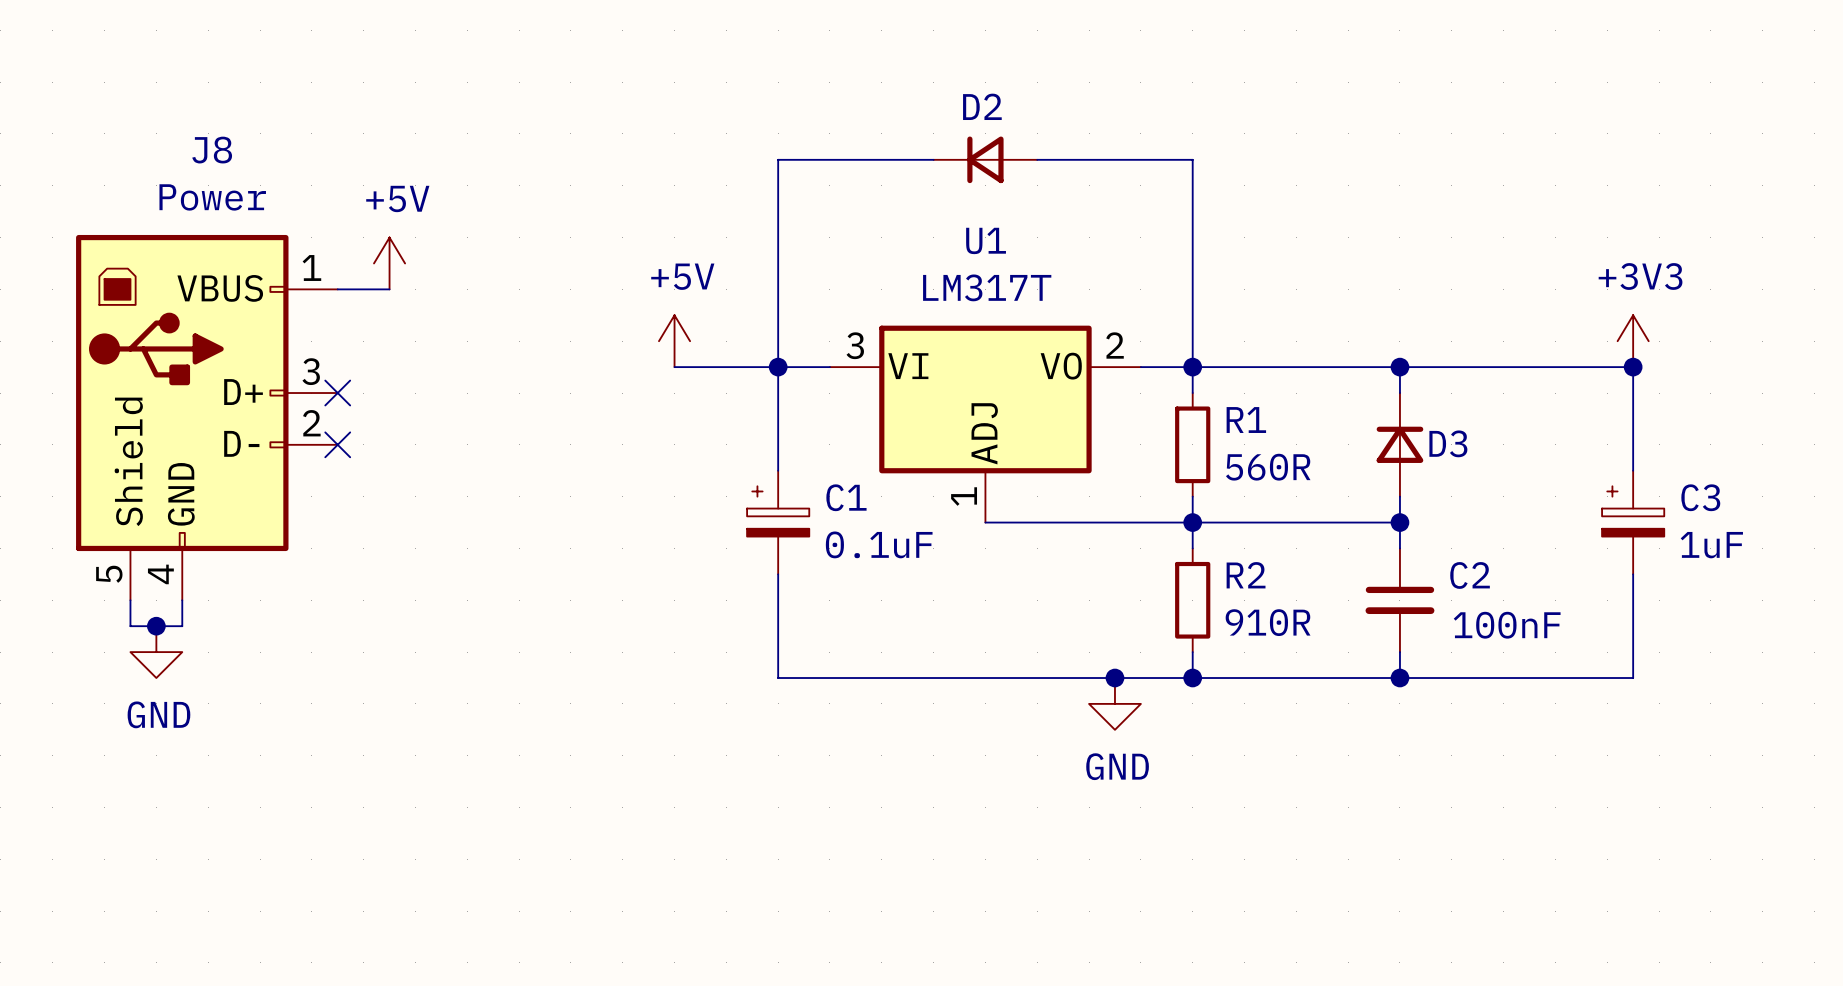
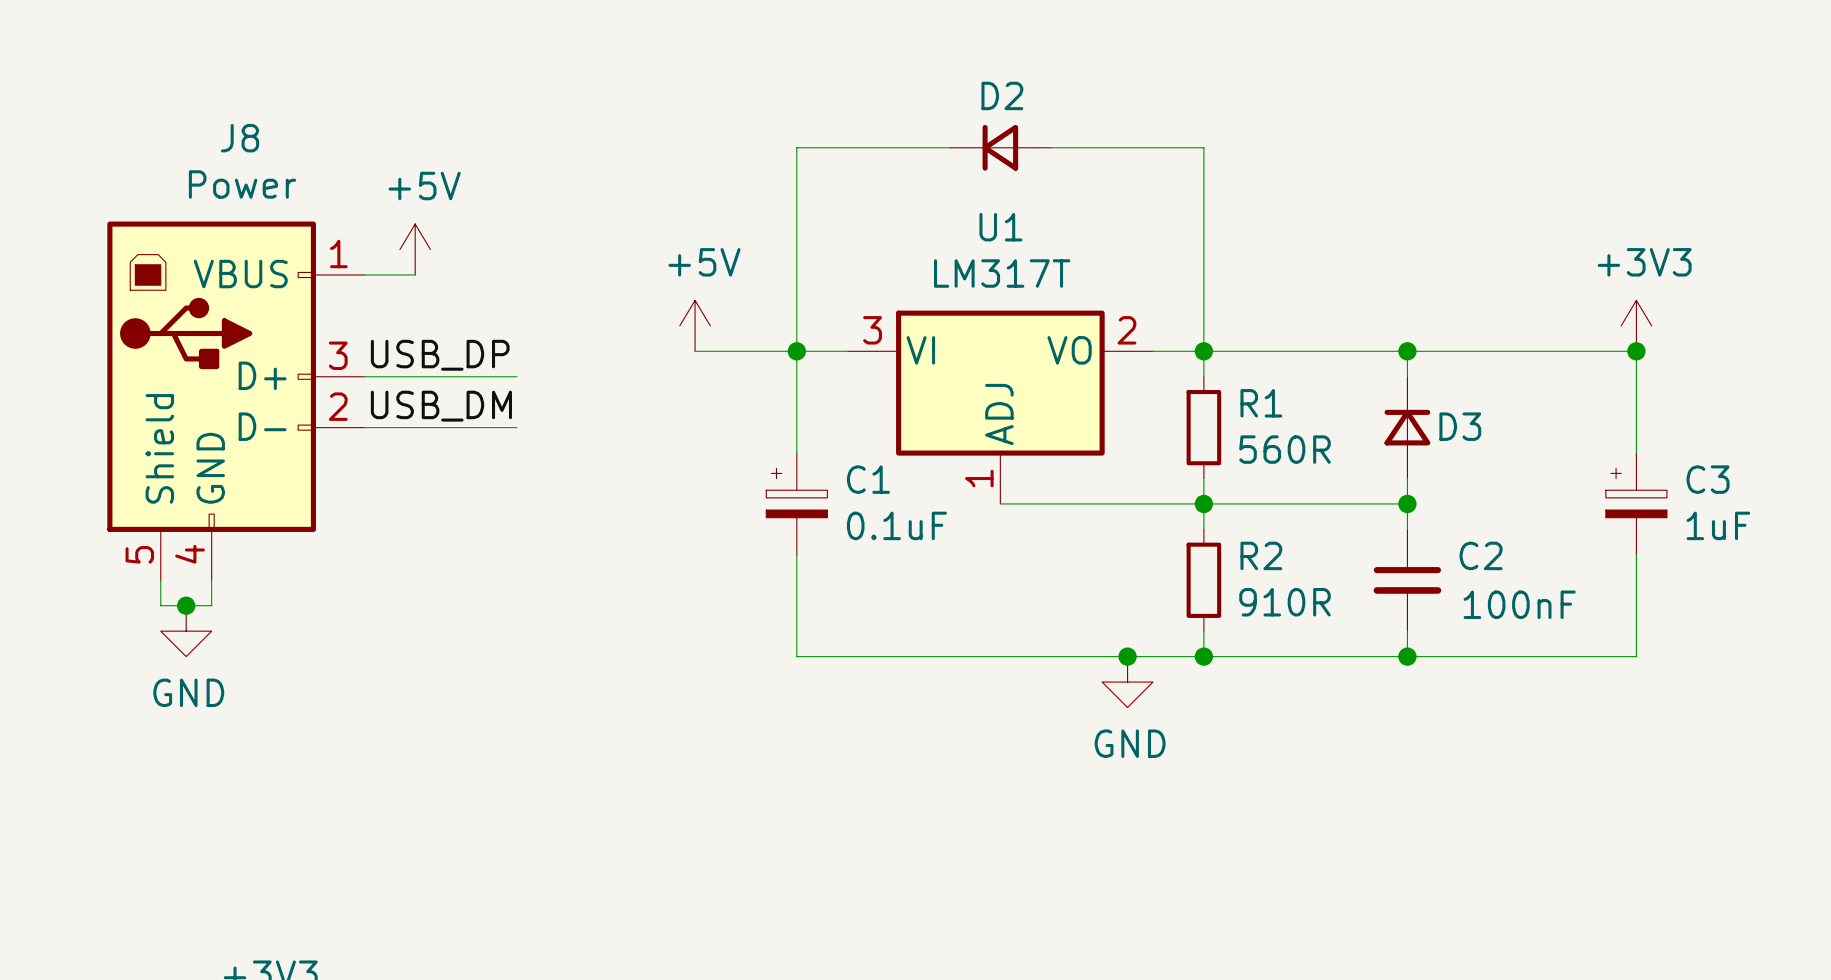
label: none -> USB_DP (440, 355)
wire: none -> (364, 376) (516, 376)
no-connect mark: (337, 393) -> none
label: none -> USB_DM (441, 406)
wire: none -> (364, 427) (516, 427)
no-connect mark: (337, 444) -> none

